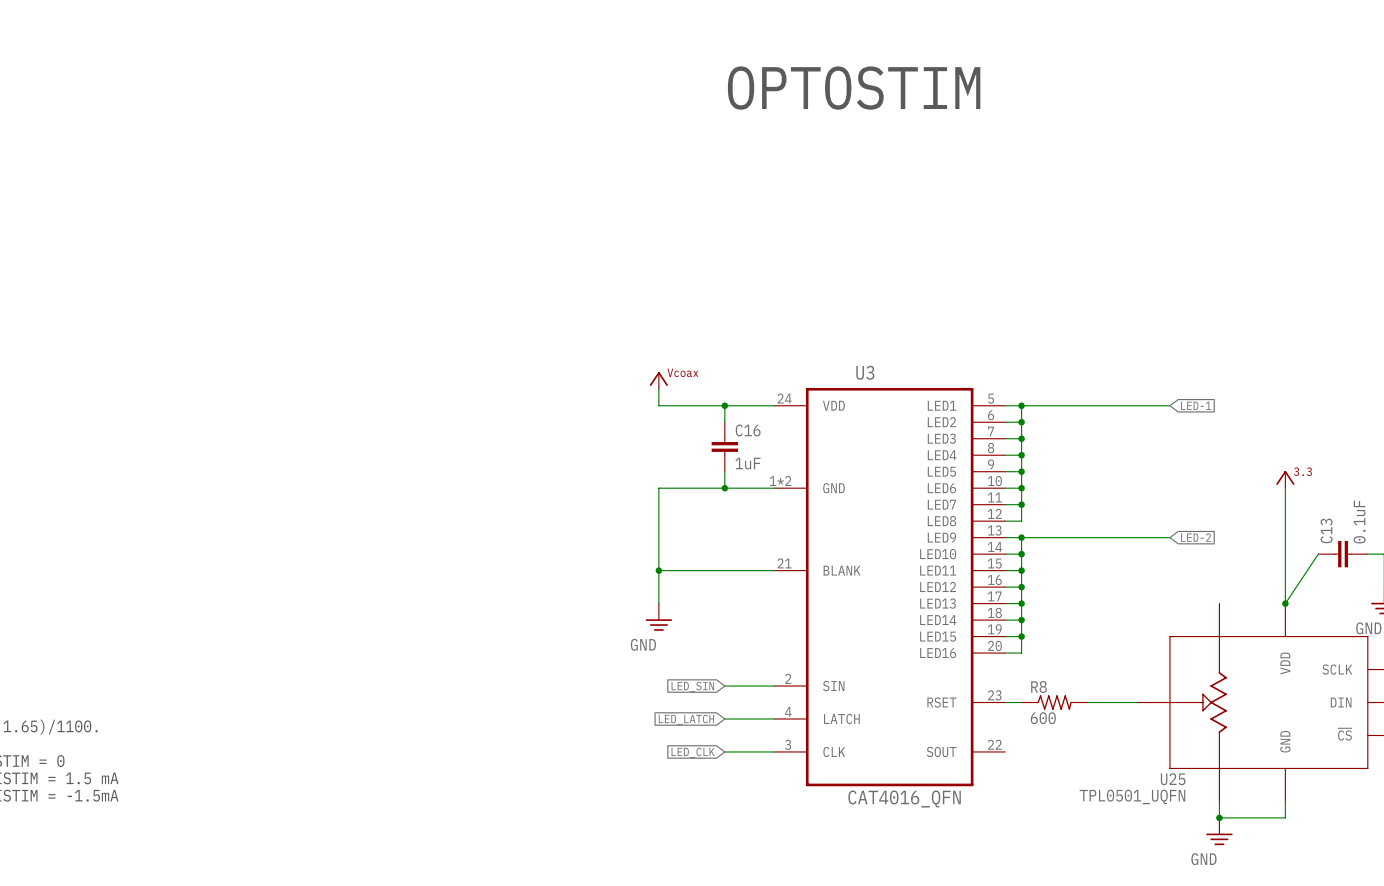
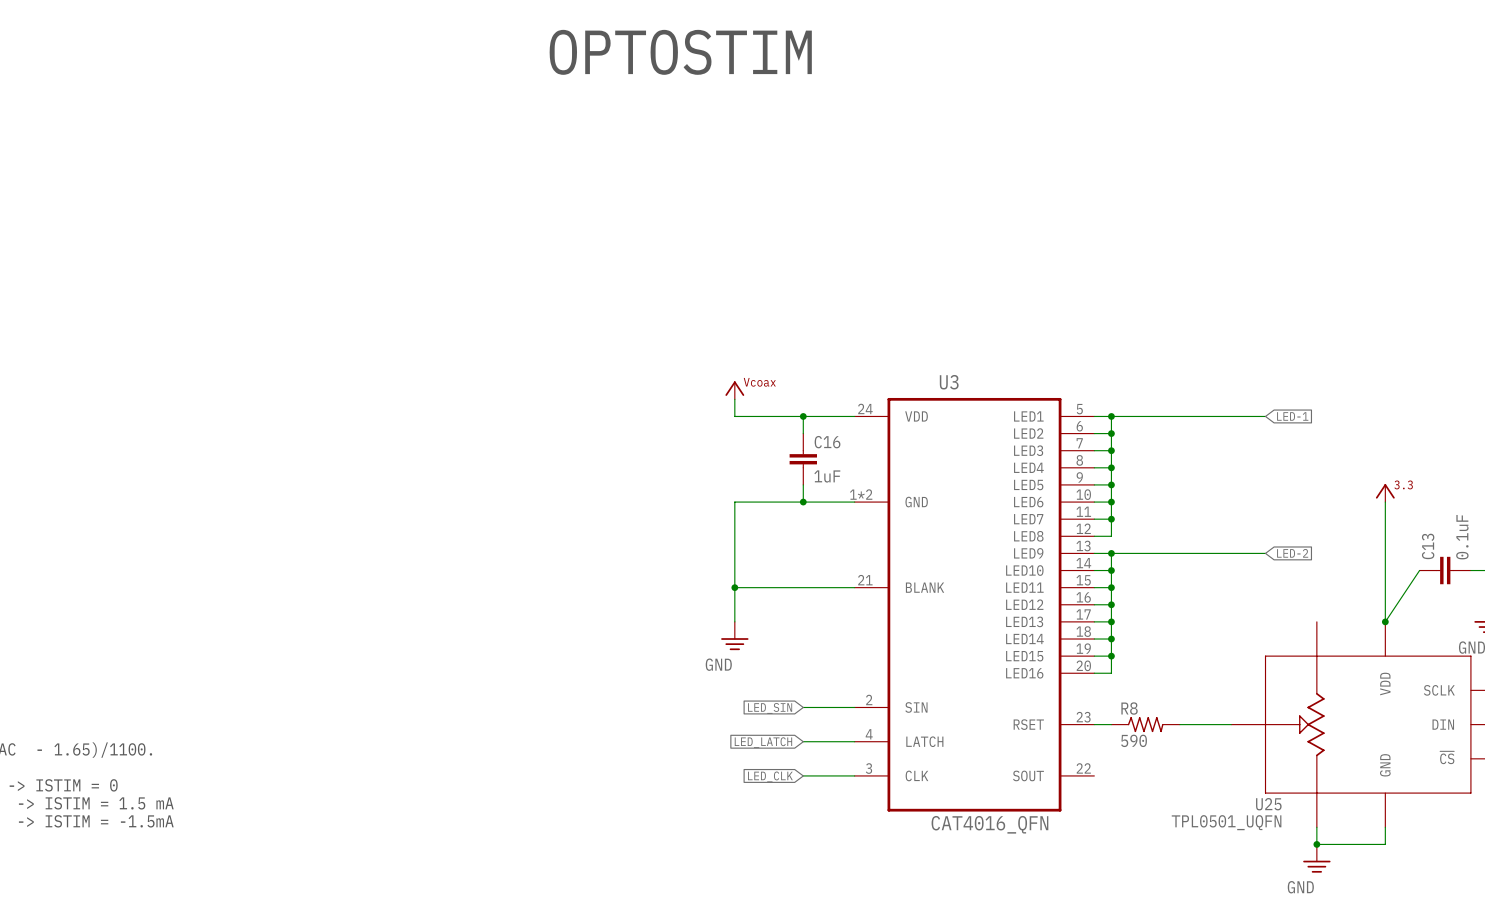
text: none -> OPTOSTIM (680, 52)
text: OPTOSTIM (854, 88) -> none
R8 value: 600 (1043, 718) -> 590 (1134, 740)

